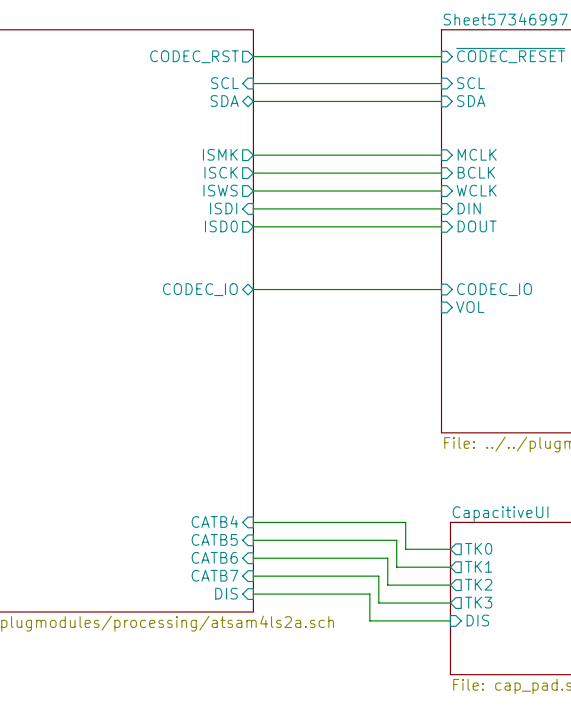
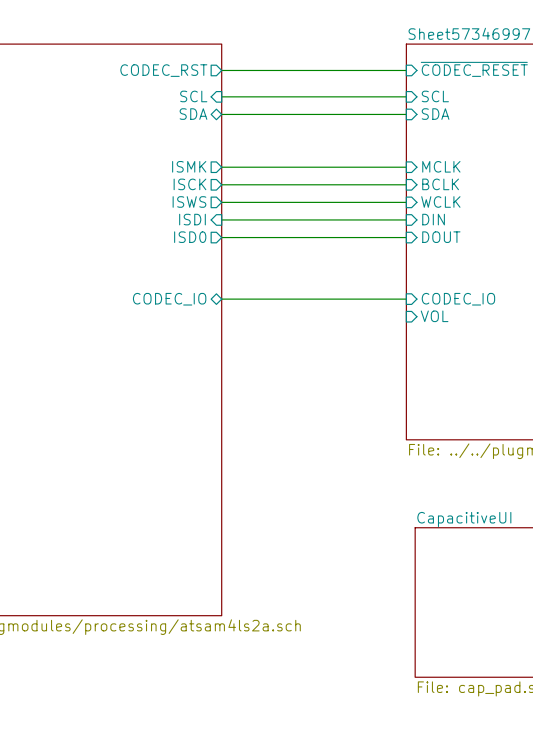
sheet pin: CATB4 (214, 521) -> none
wire: (253, 522) (405, 522) (405, 549) (450, 549) -> none
sheet pin: CATB5 (214, 539) -> none
wire: (253, 540) (396, 540) (396, 567) (450, 567) -> none
sheet pin: TK0 (478, 548) -> none
sheet pin: CATB6 (214, 557) -> none
wire: (253, 558) (387, 558) (387, 585) (450, 585) -> none
sheet pin: TK1 (478, 566) -> none
sheet pin: CATB7 (214, 575) -> none
wire: (253, 576) (378, 576) (378, 603) (450, 603) -> none
sheet pin: TK2 (478, 584) -> none
sheet pin: DIS (226, 593) -> none
wire: (253, 594) (369, 594) (369, 620) (450, 620) -> none
sheet pin: TK3 (478, 602) -> none
sheet pin: DIS (477, 620) -> none

